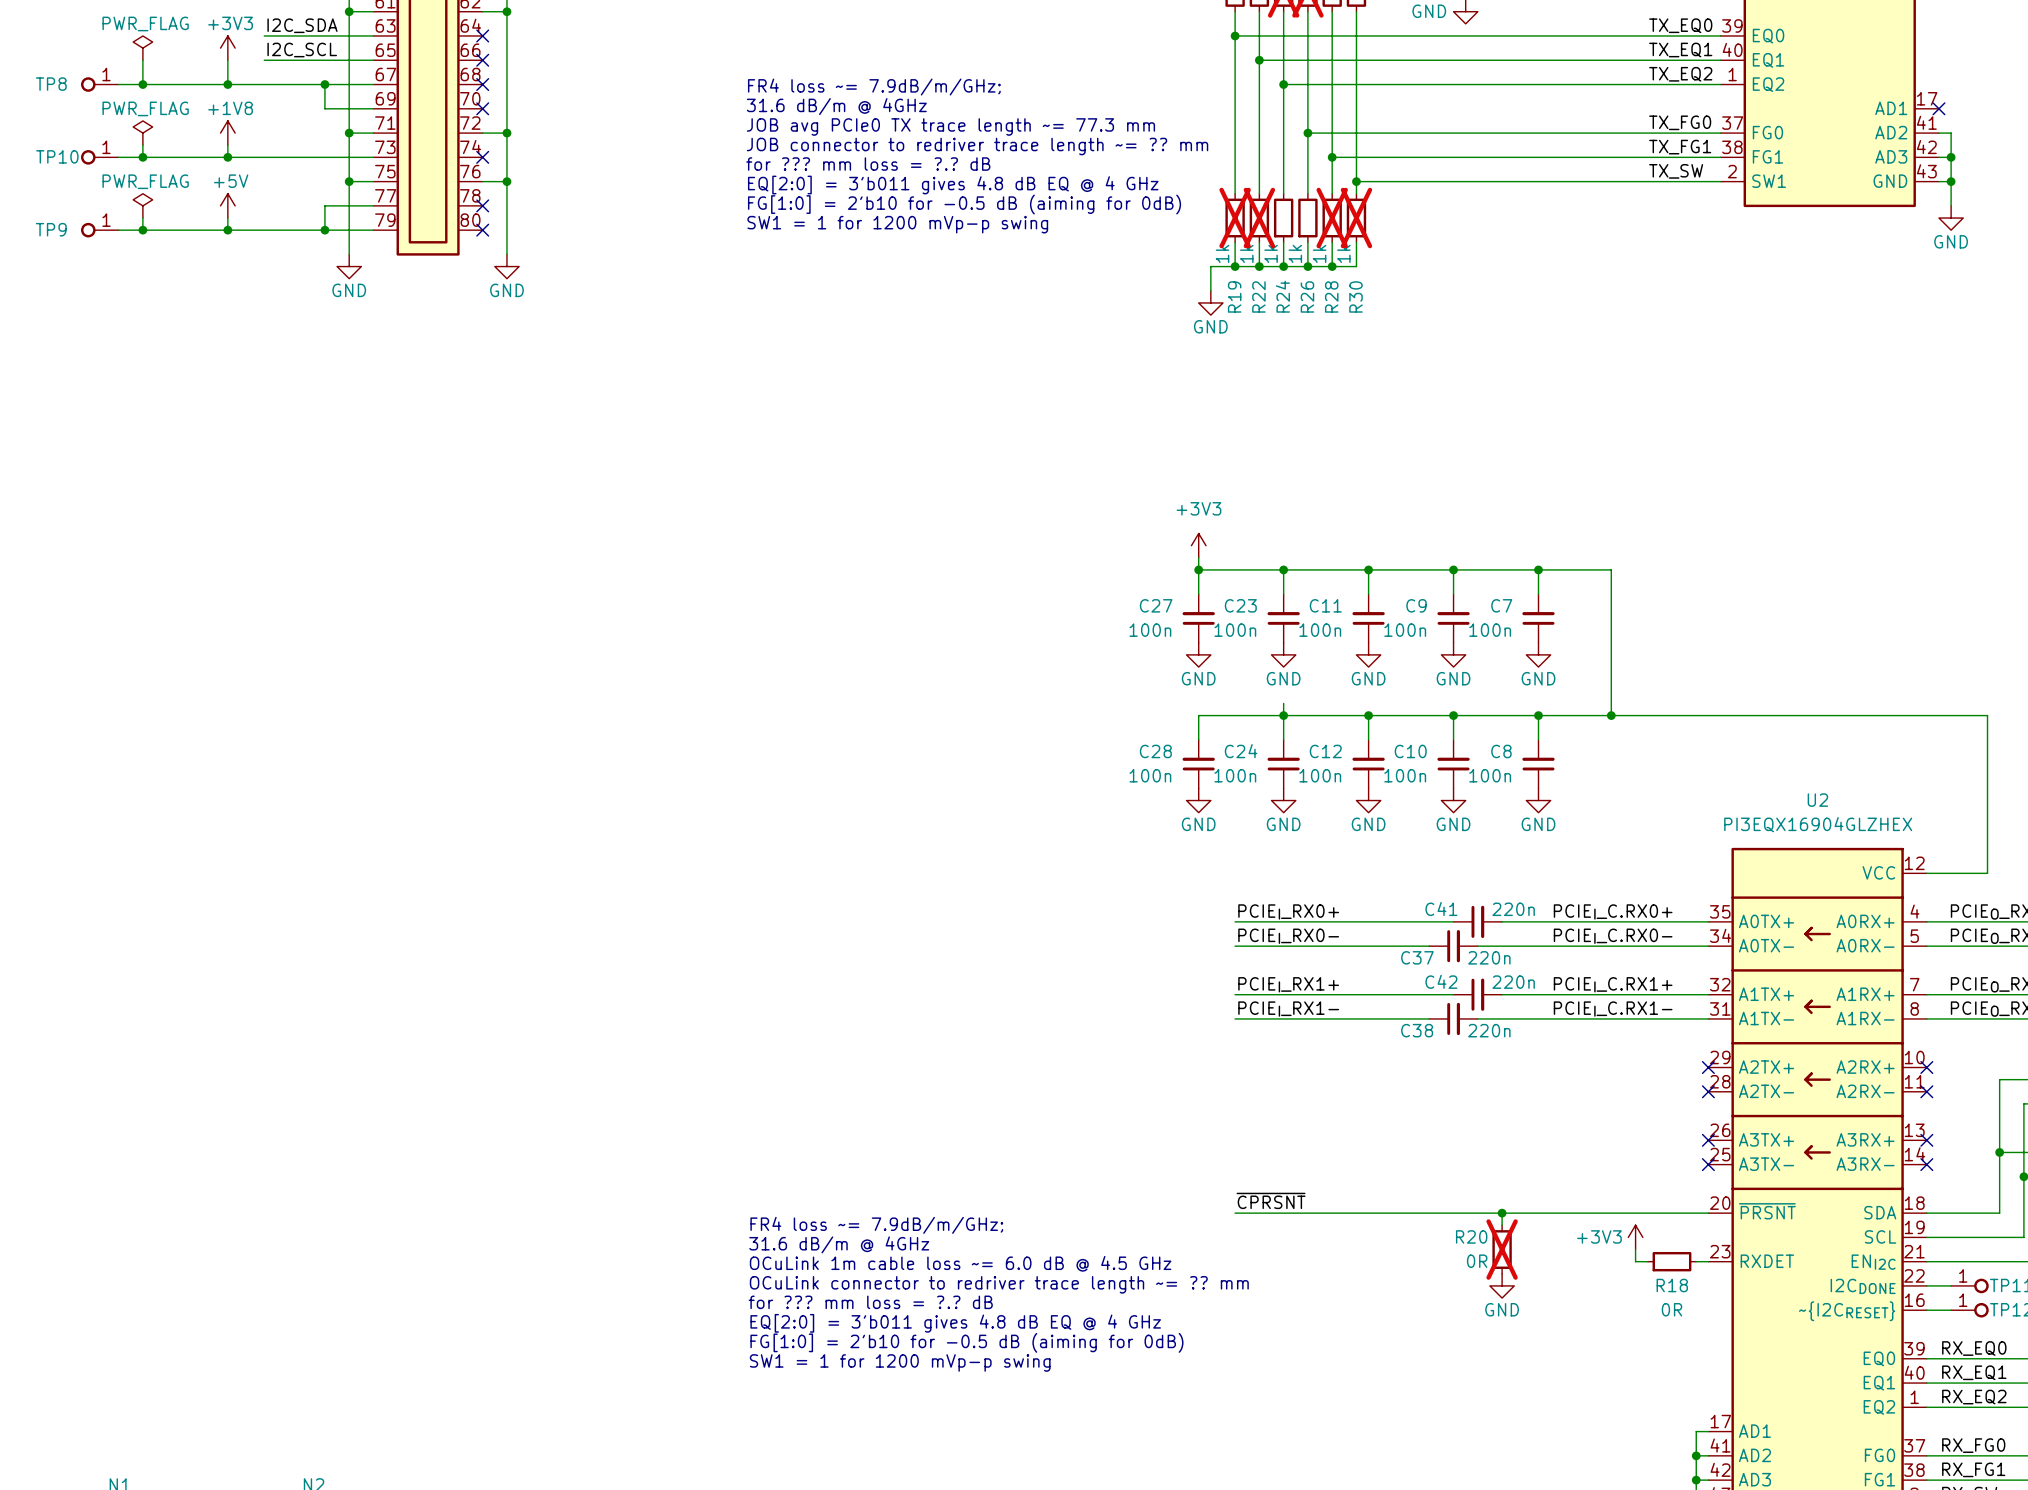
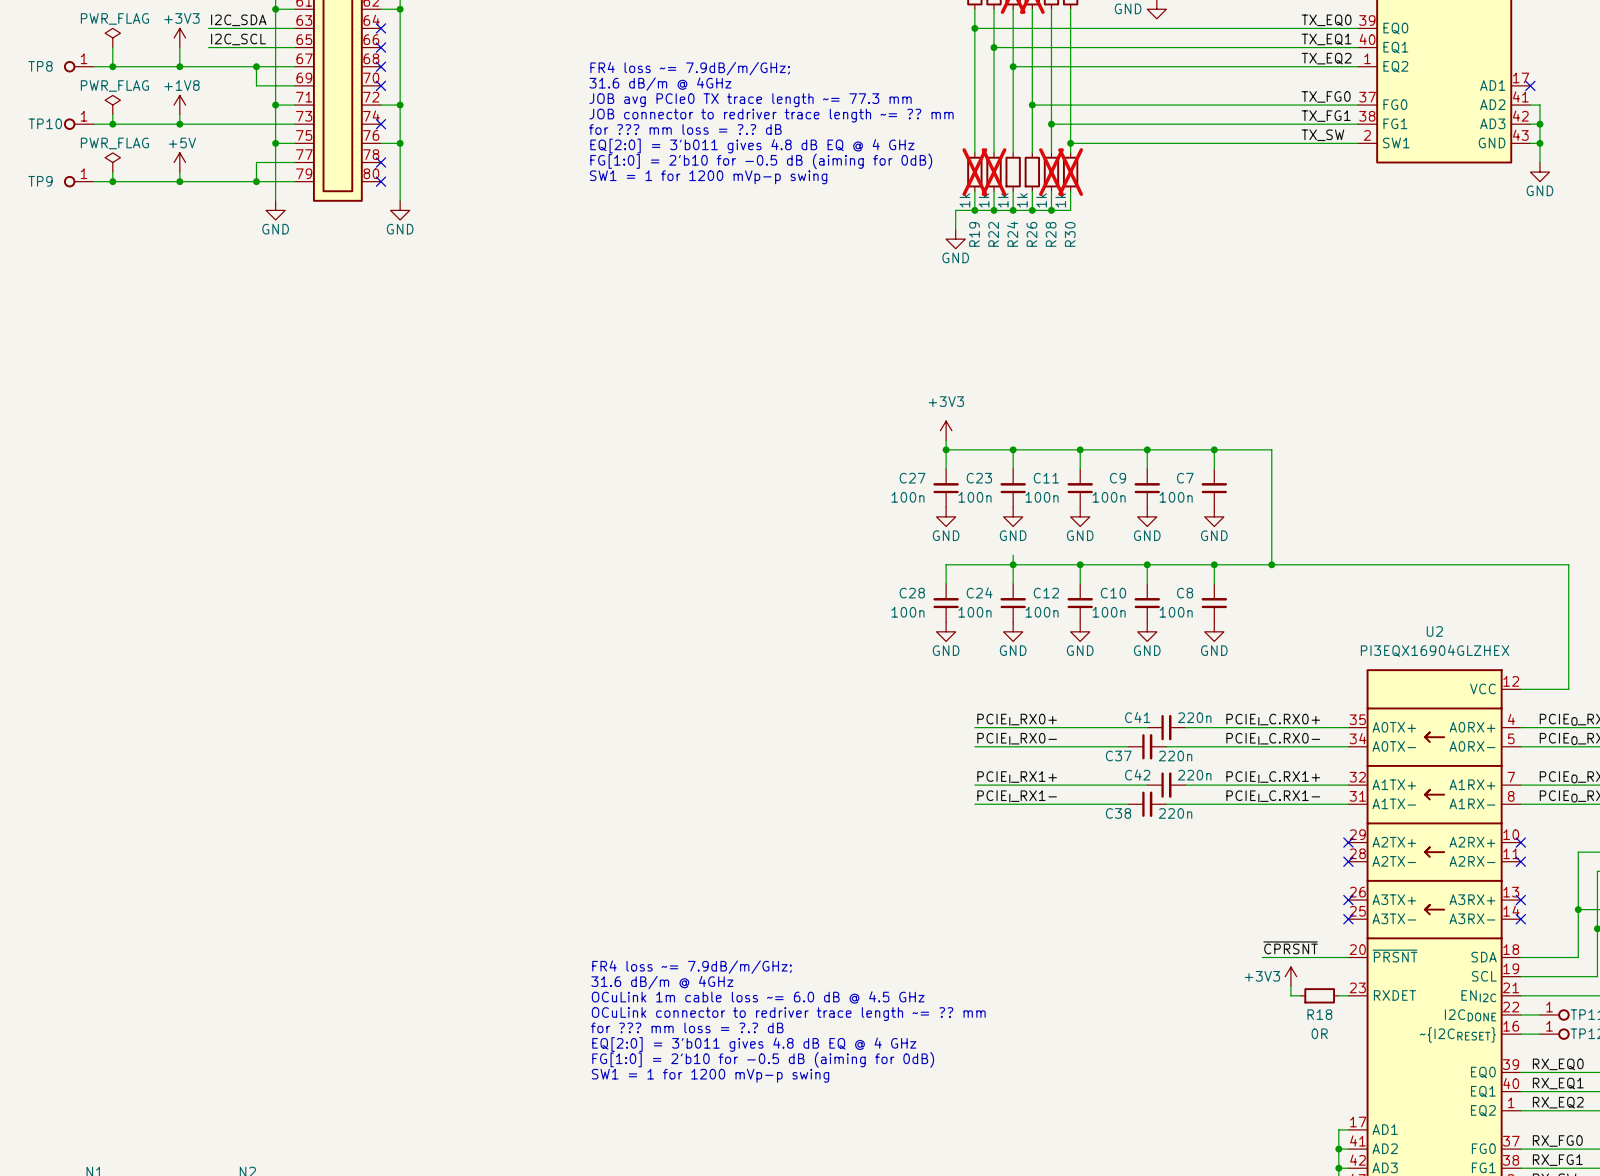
label: ~{CPRSNT} (1271, 1200) -> none
label: none -> ~{CPRSNT} (1290, 947)
wire: (1235, 1213) (1599, 1213) -> none
wire: (1502, 1213) (1502, 1225) -> none
junction: (1502, 1213) -> none
R20: (1502, 1249) -> none
power symbol: GND (1502, 1285) -> none

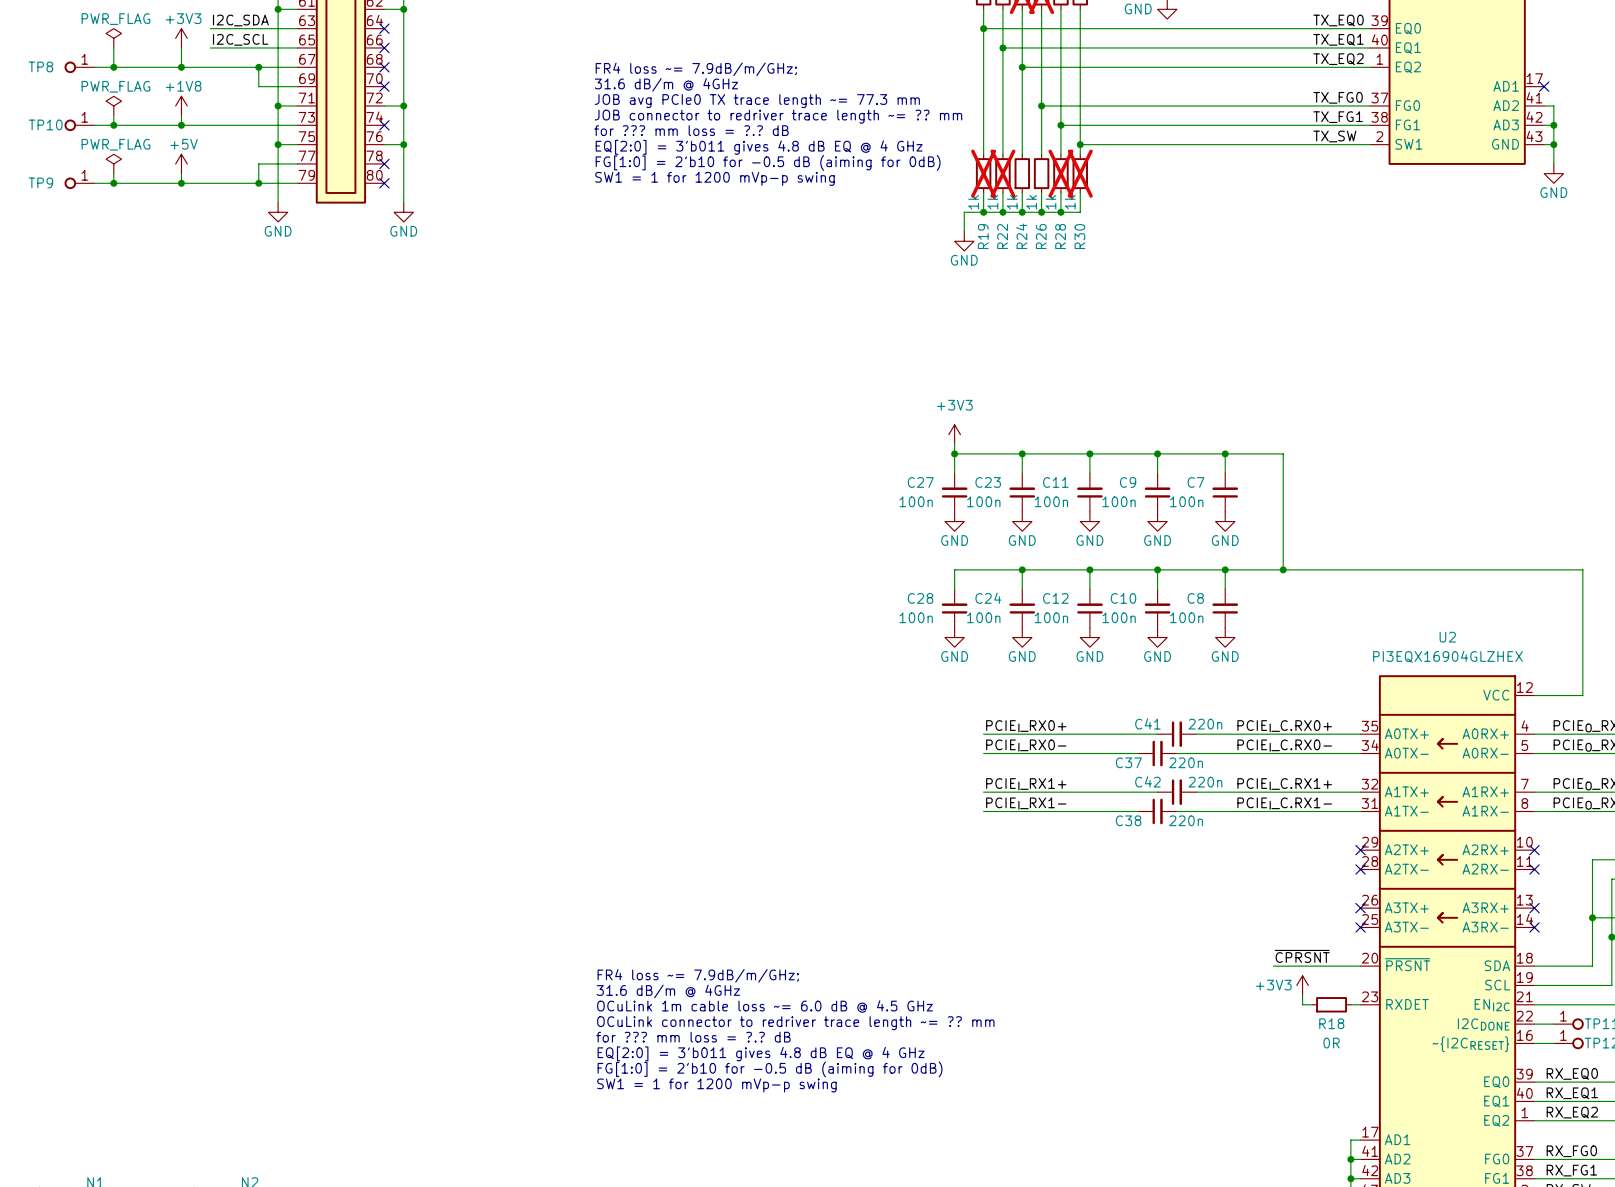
wire: (1013, 555) (1013, 564) -> none

